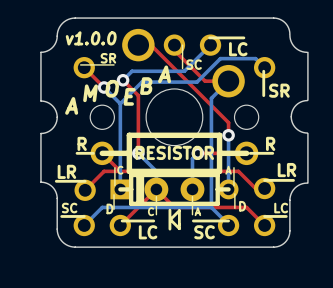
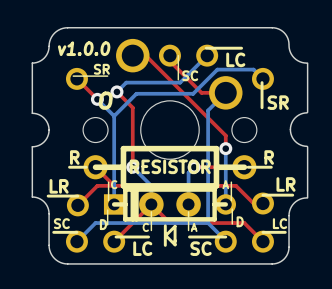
text: A (164, 74) -> none
text: B (146, 86) -> none
text: M (90, 93) -> none
text: E (129, 96) -> none
text: A (71, 105) -> none

